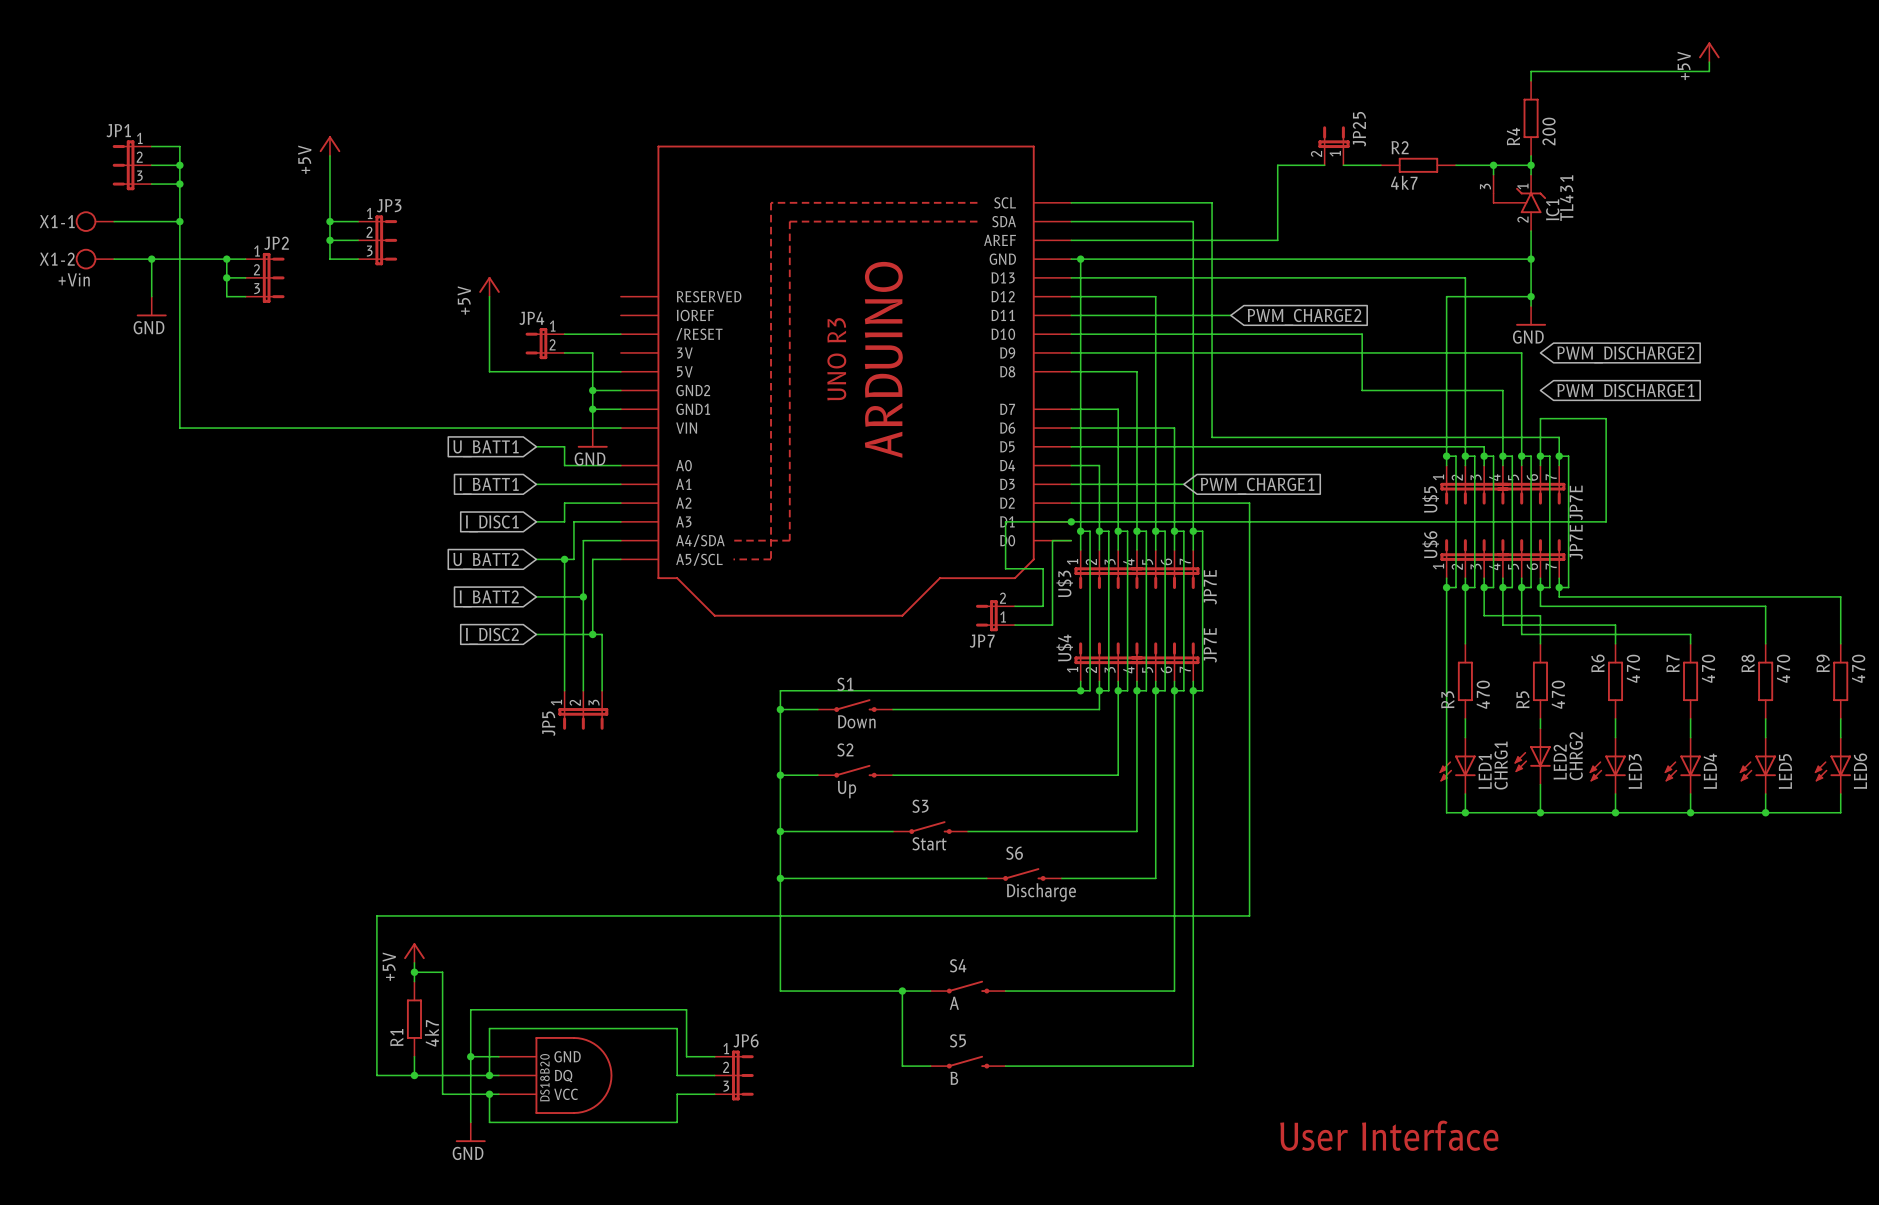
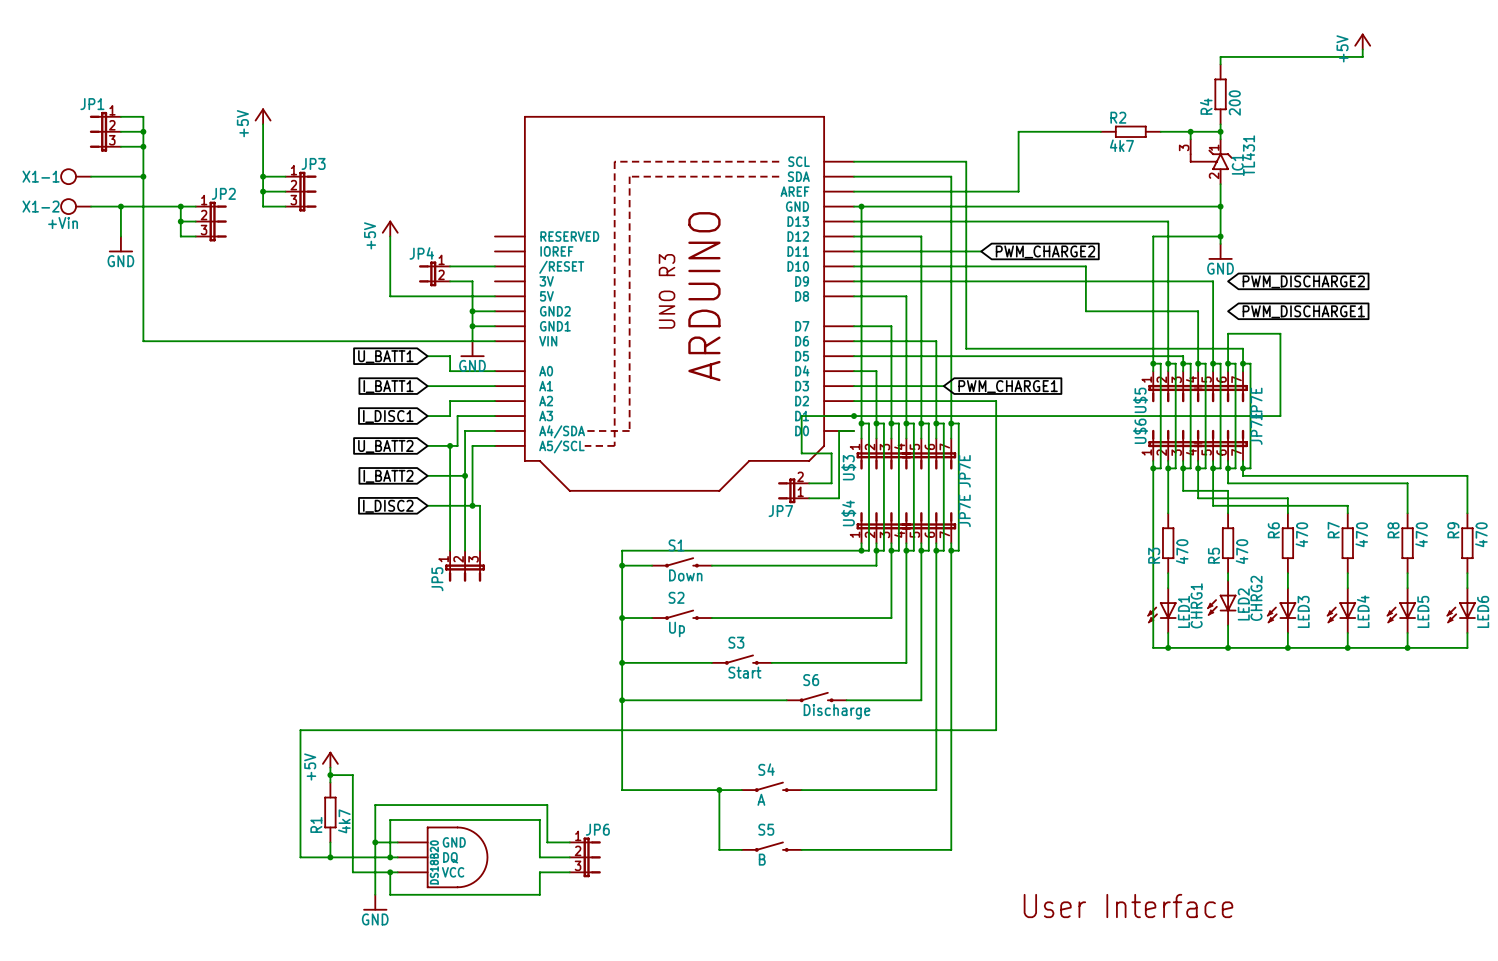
JP25: (1334, 145) -> none
wire: none -> (1056, 131) (1070, 131)

